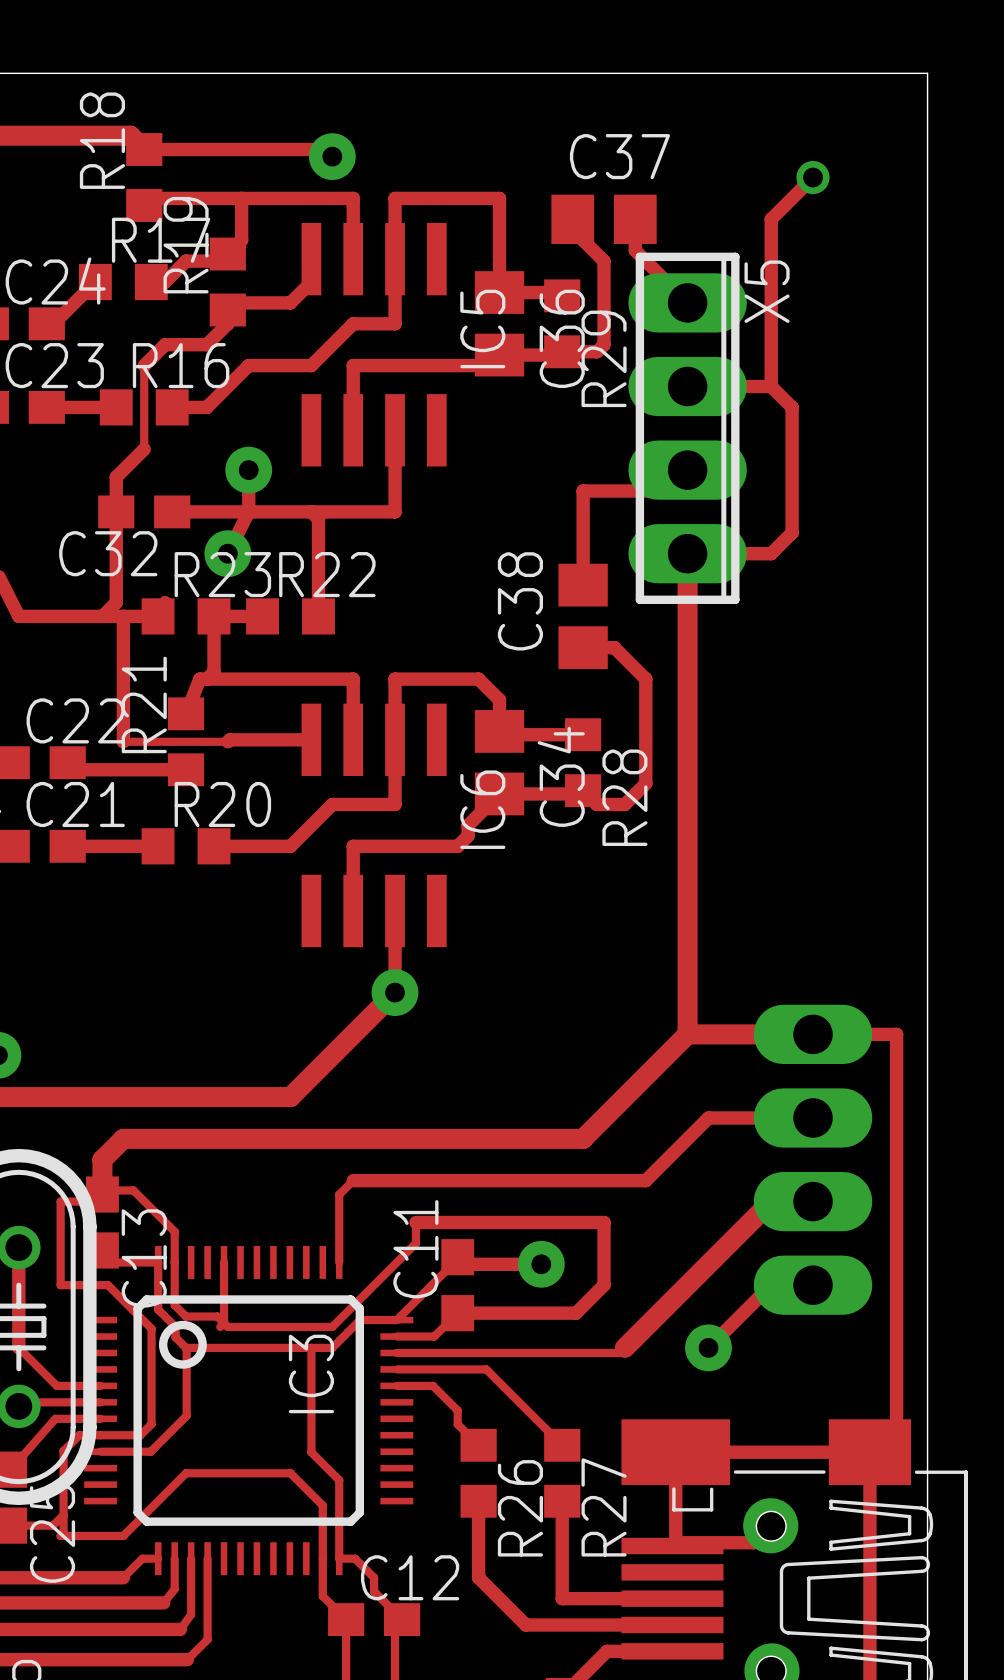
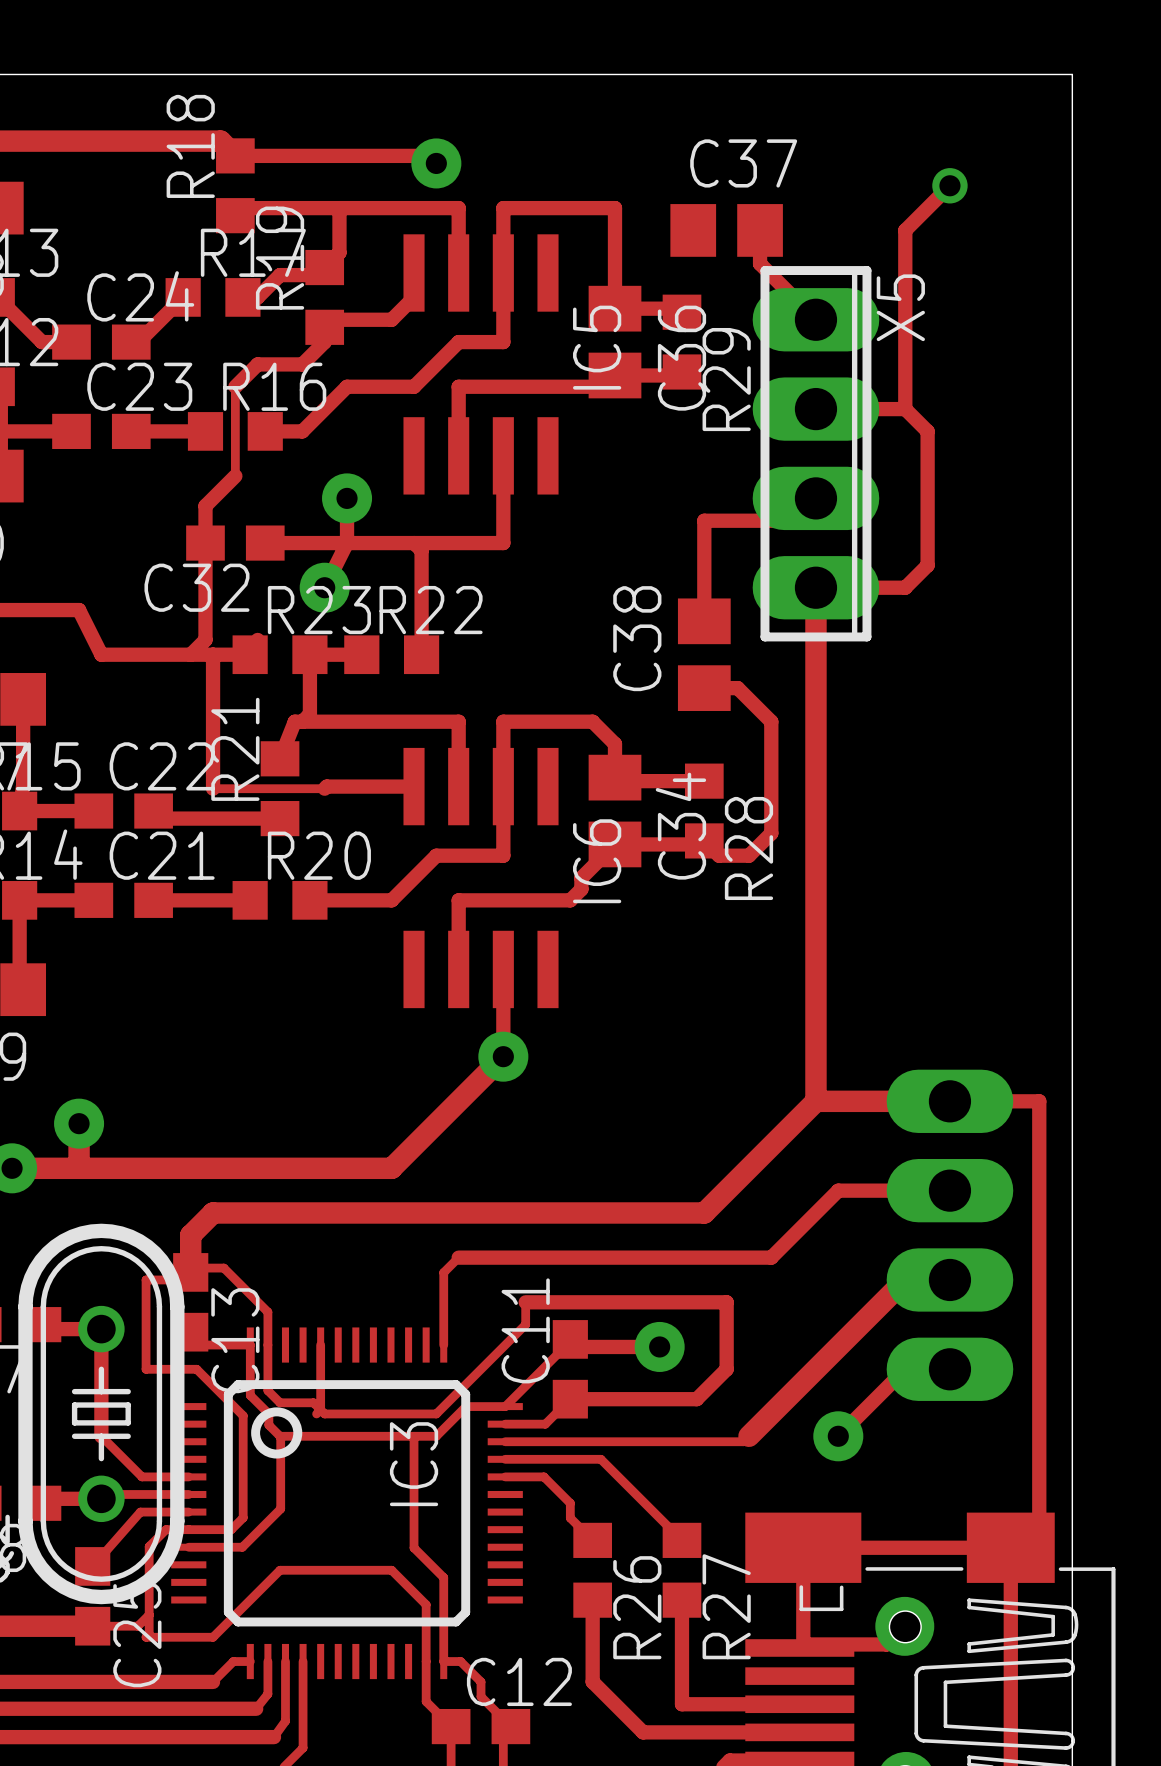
track: (572, 219) (583, 229) (583, 240) (604, 261) (604, 344) (596, 351) (562, 351) -> none

